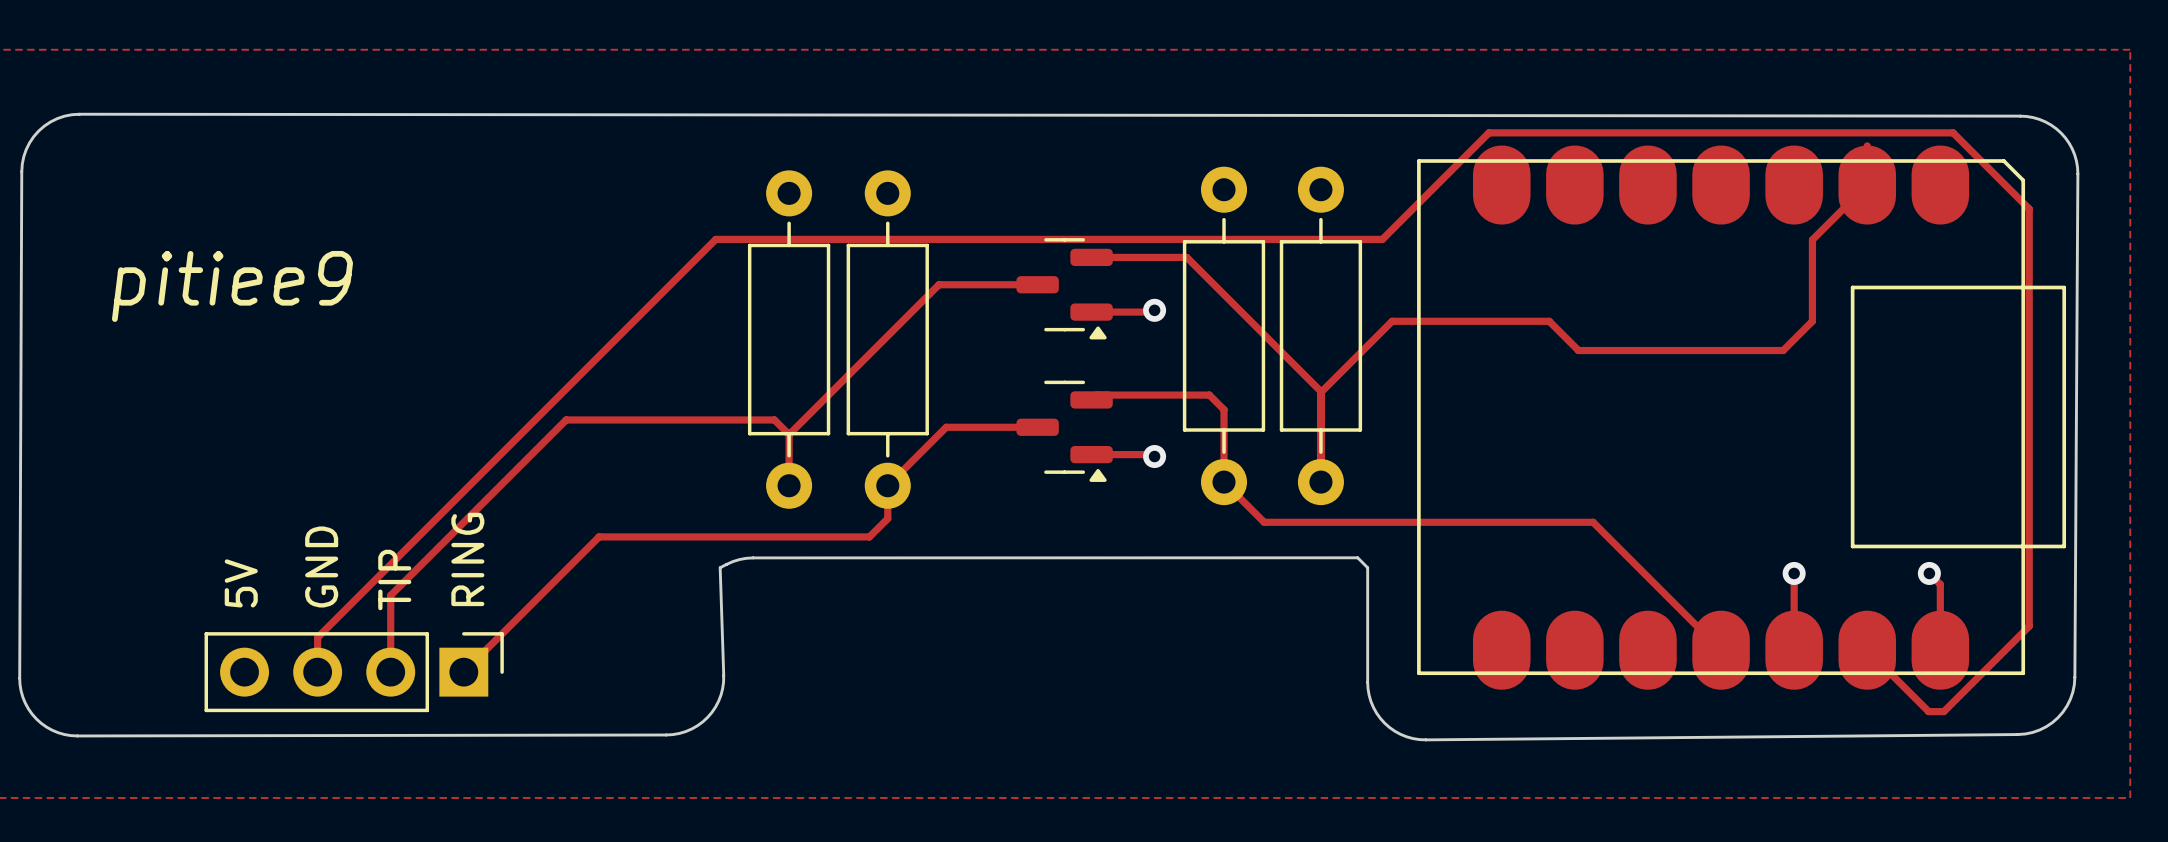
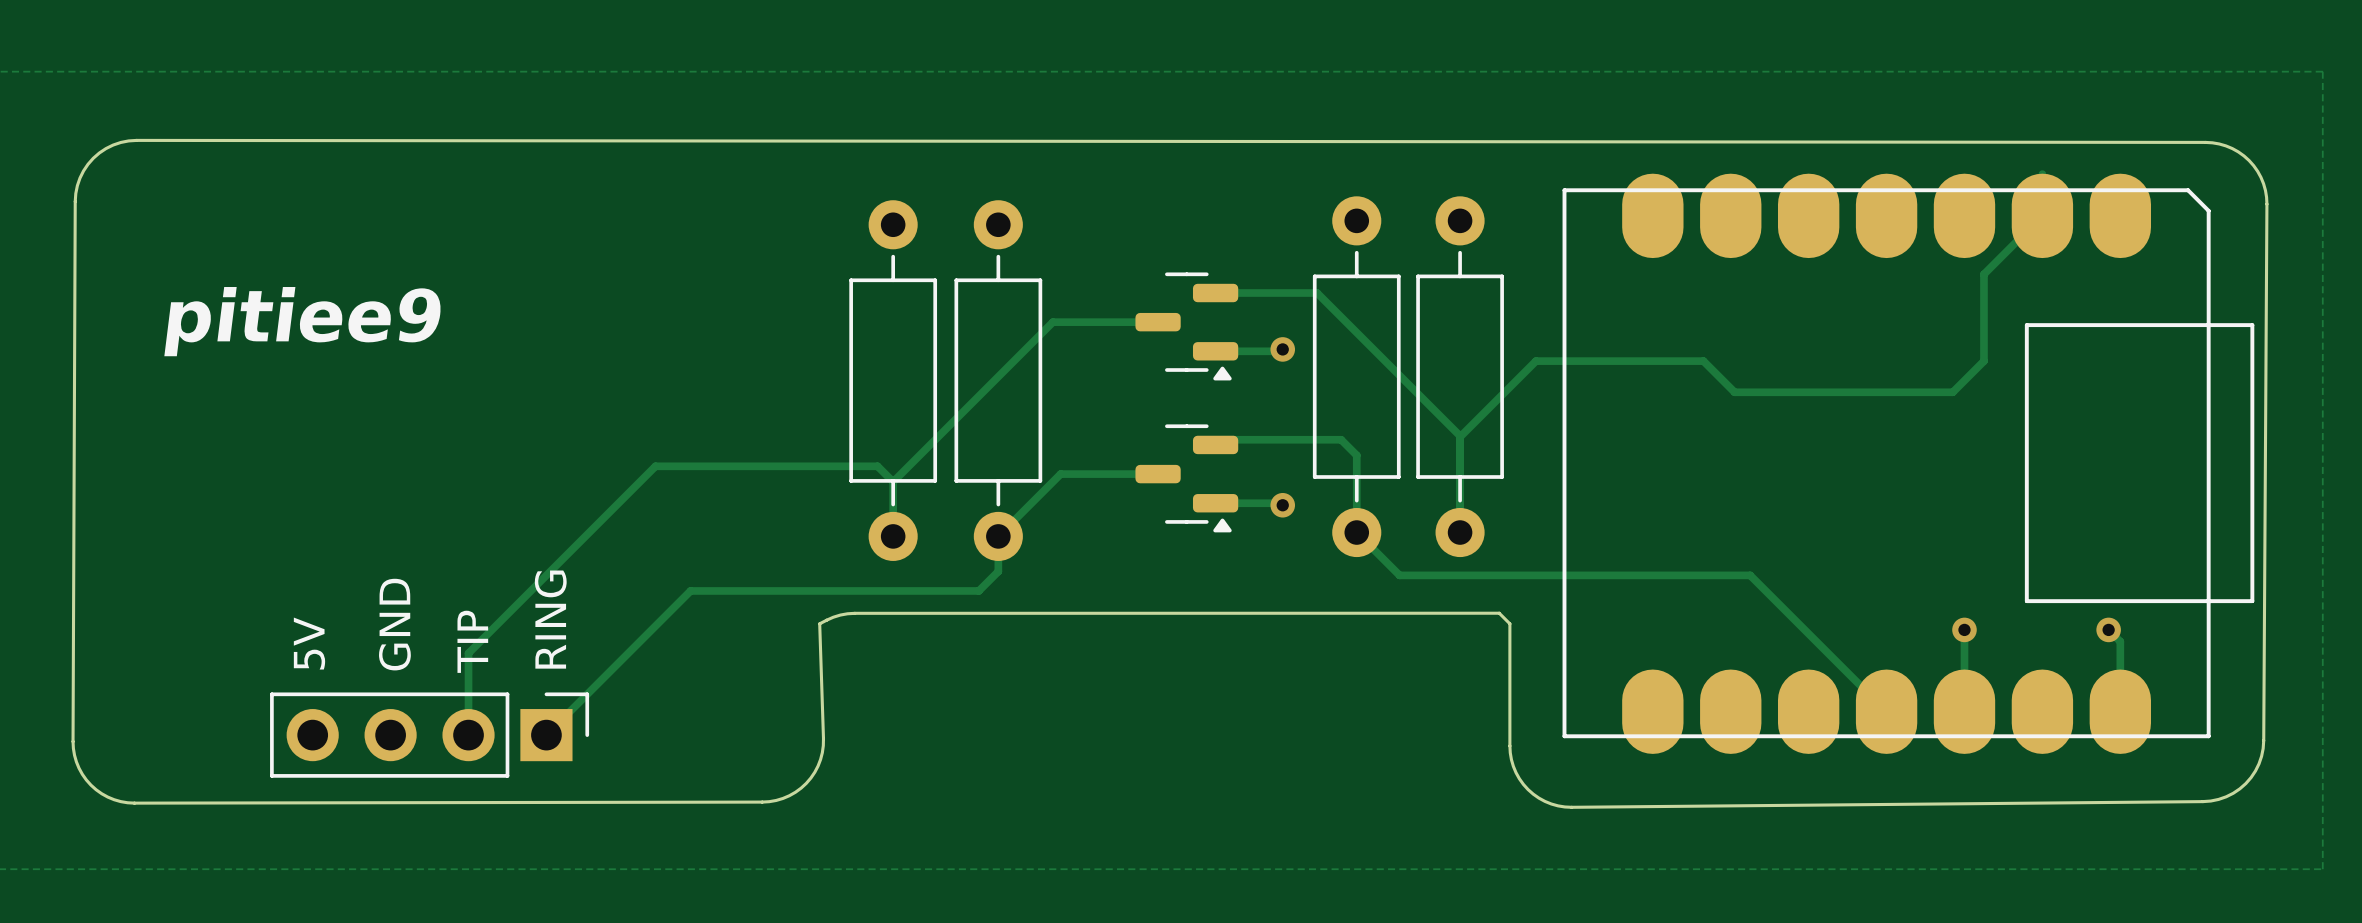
track: (1867, 650) (1928, 711) (1943, 711) (2029, 626) (2029, 208) (1953, 132) (1488, 132) (1382, 239) (715, 239) (317, 637) (317, 672) -> none

